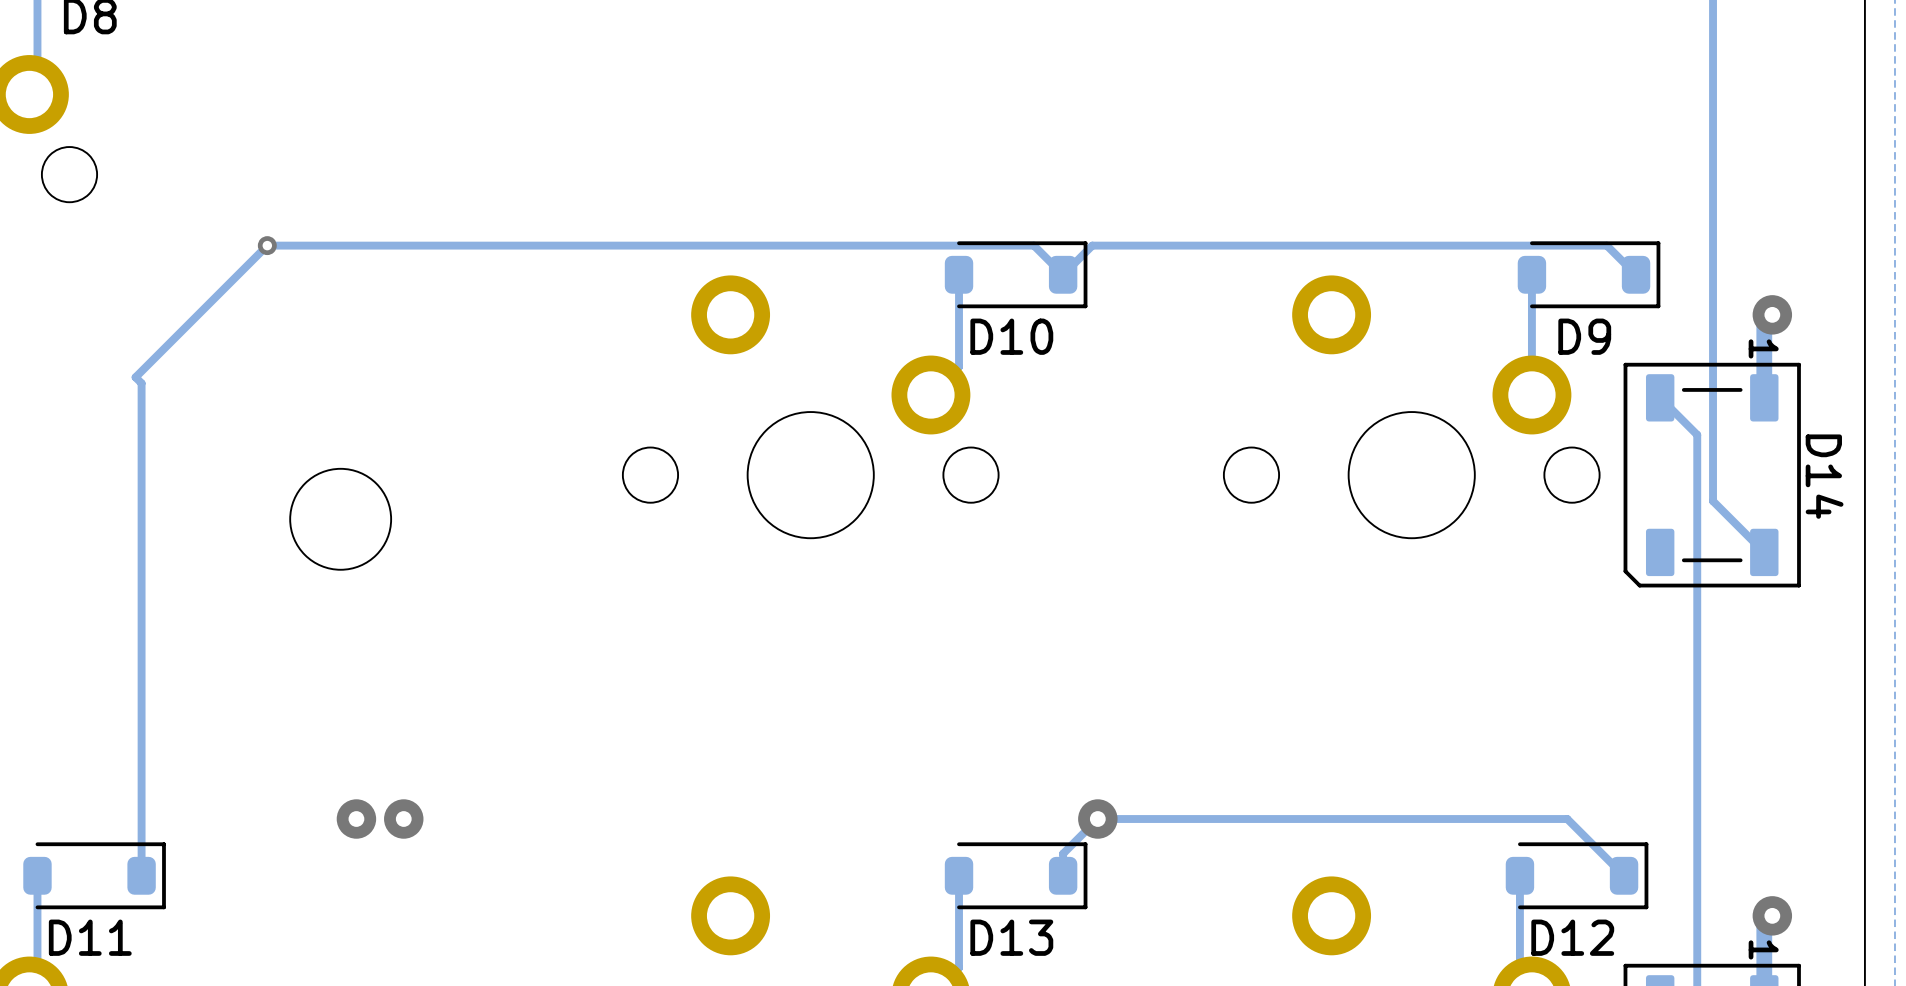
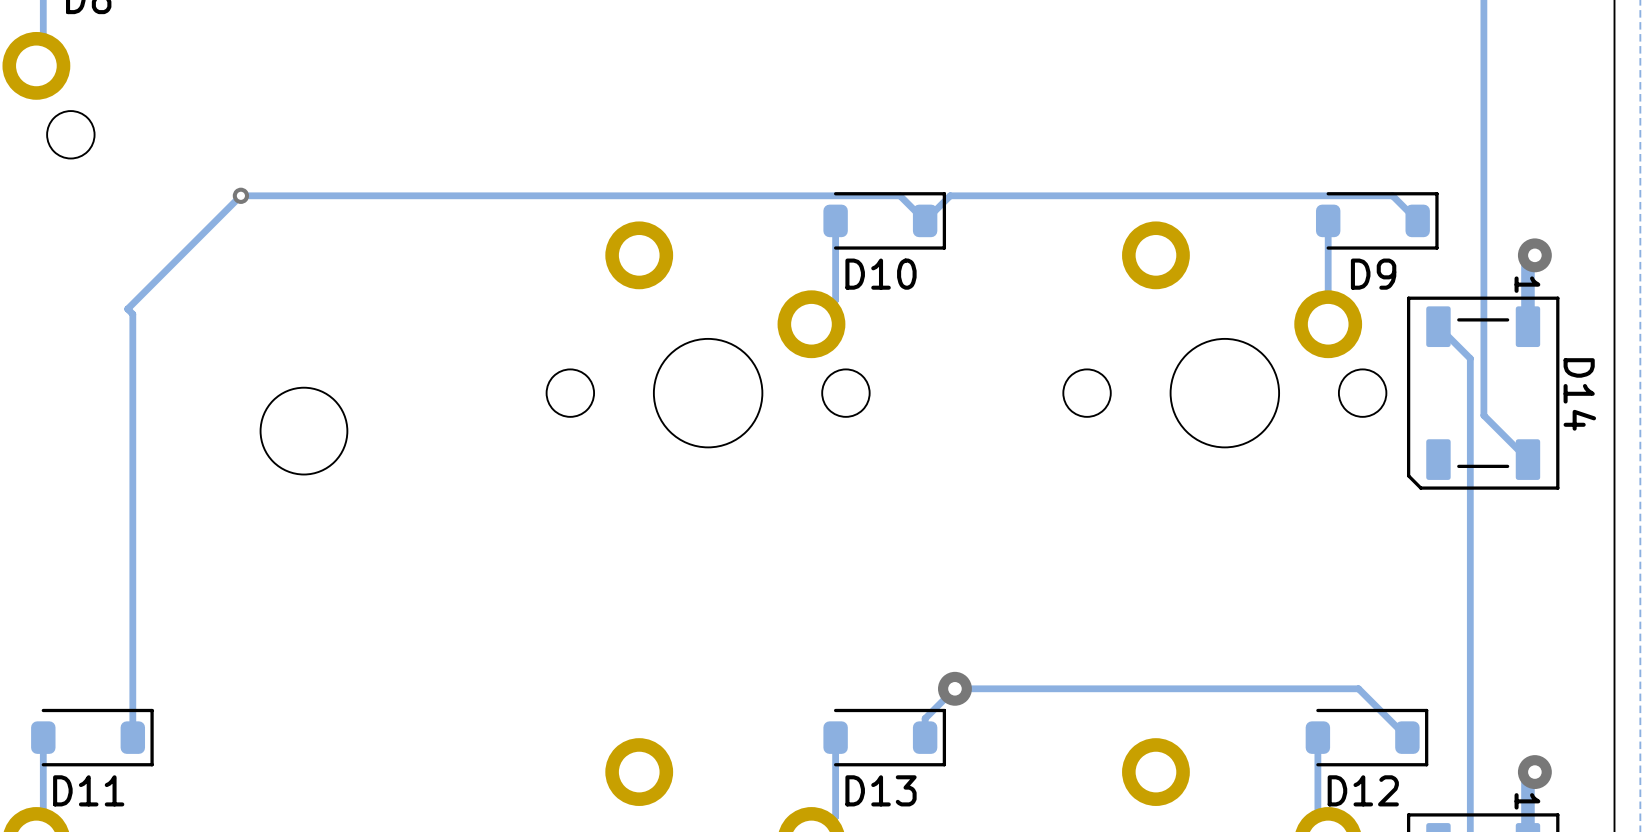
via: (356, 819) -> none
via: (403, 819) -> none

